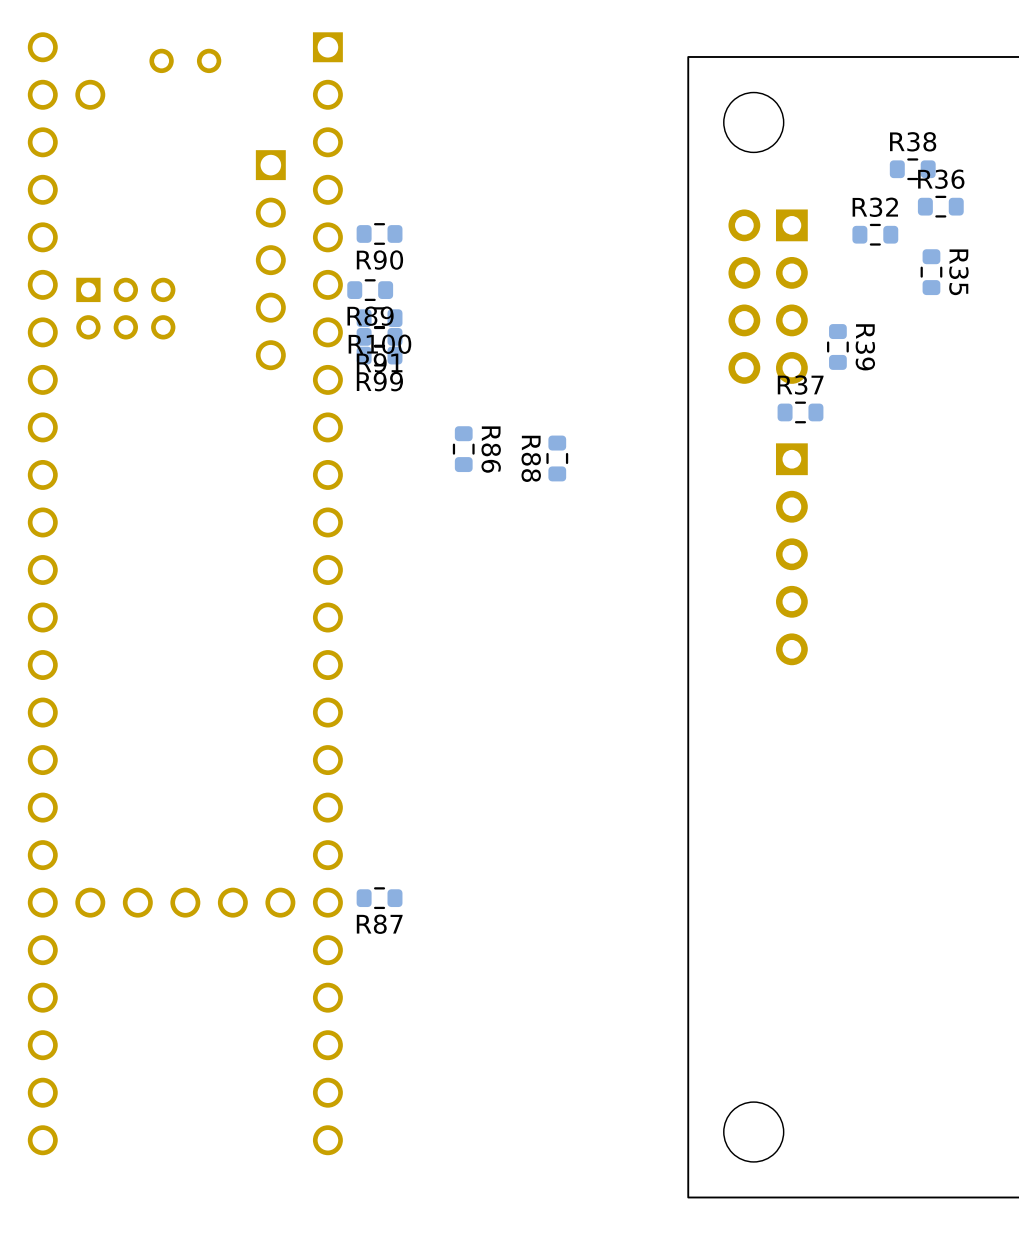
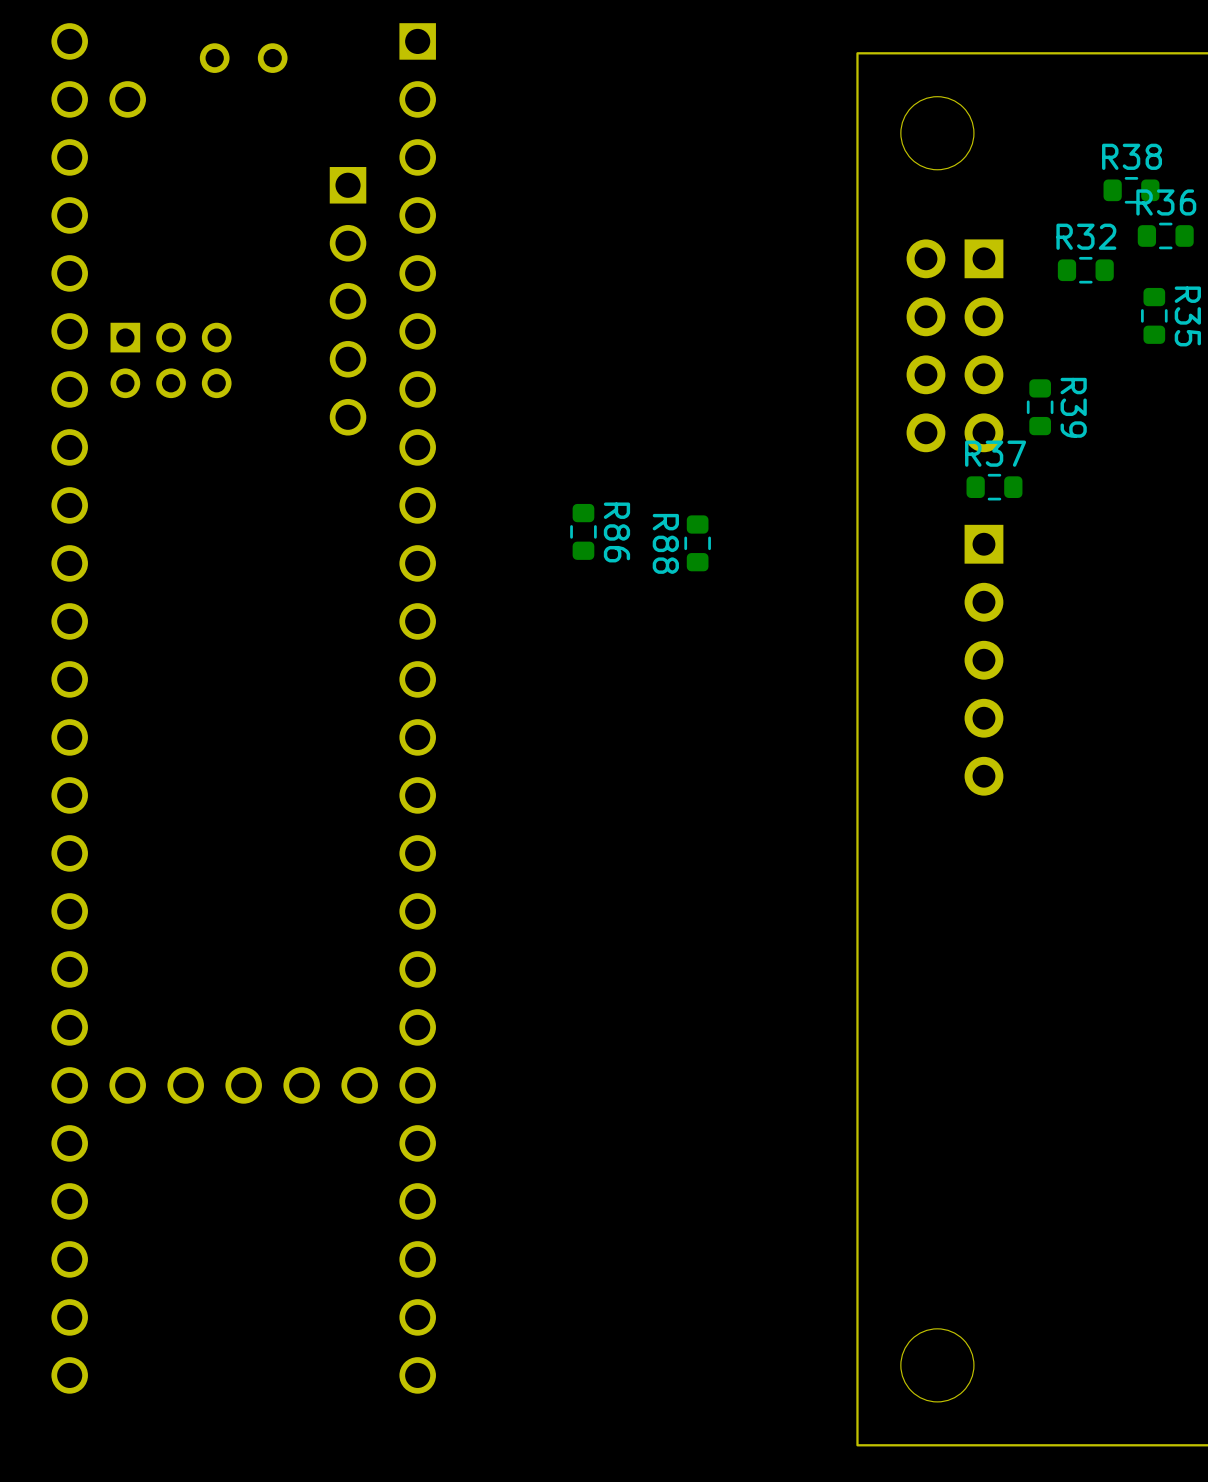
R90: (379, 233) -> none
R89: (370, 290) -> none
R100: (379, 318) -> none
R91: (379, 336) -> none
R99: (379, 355) -> none
R87: (379, 898) -> none

